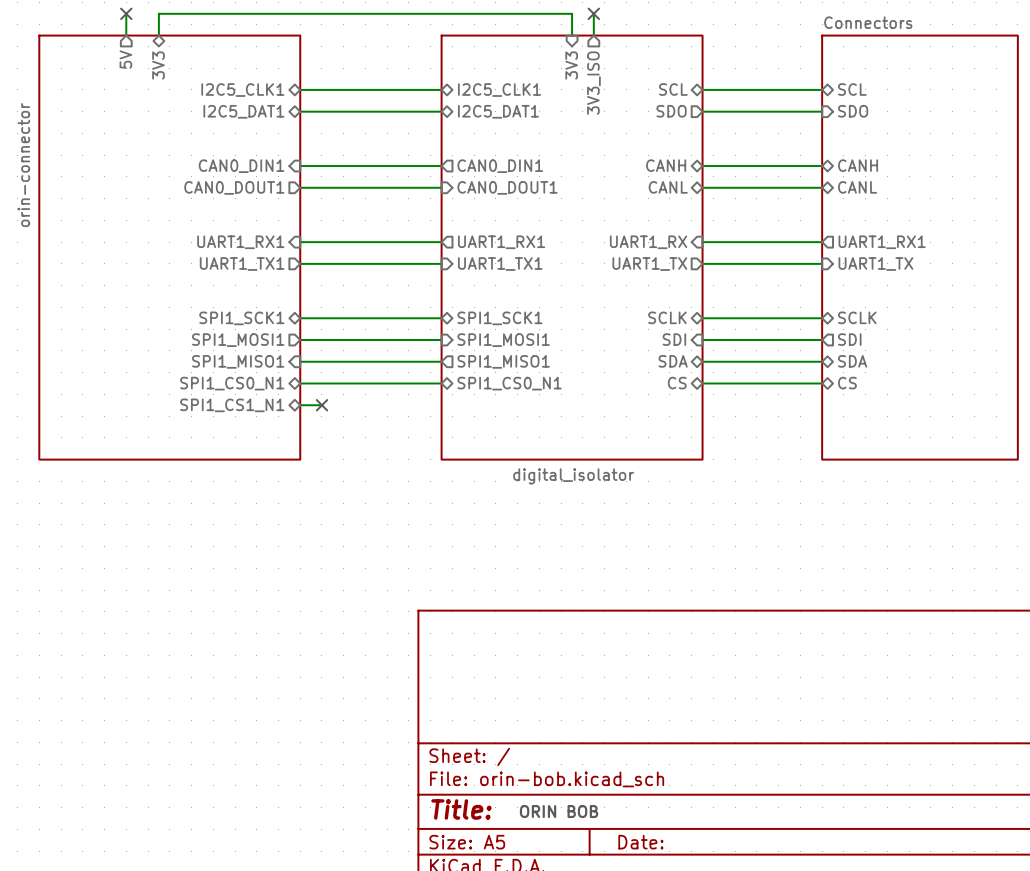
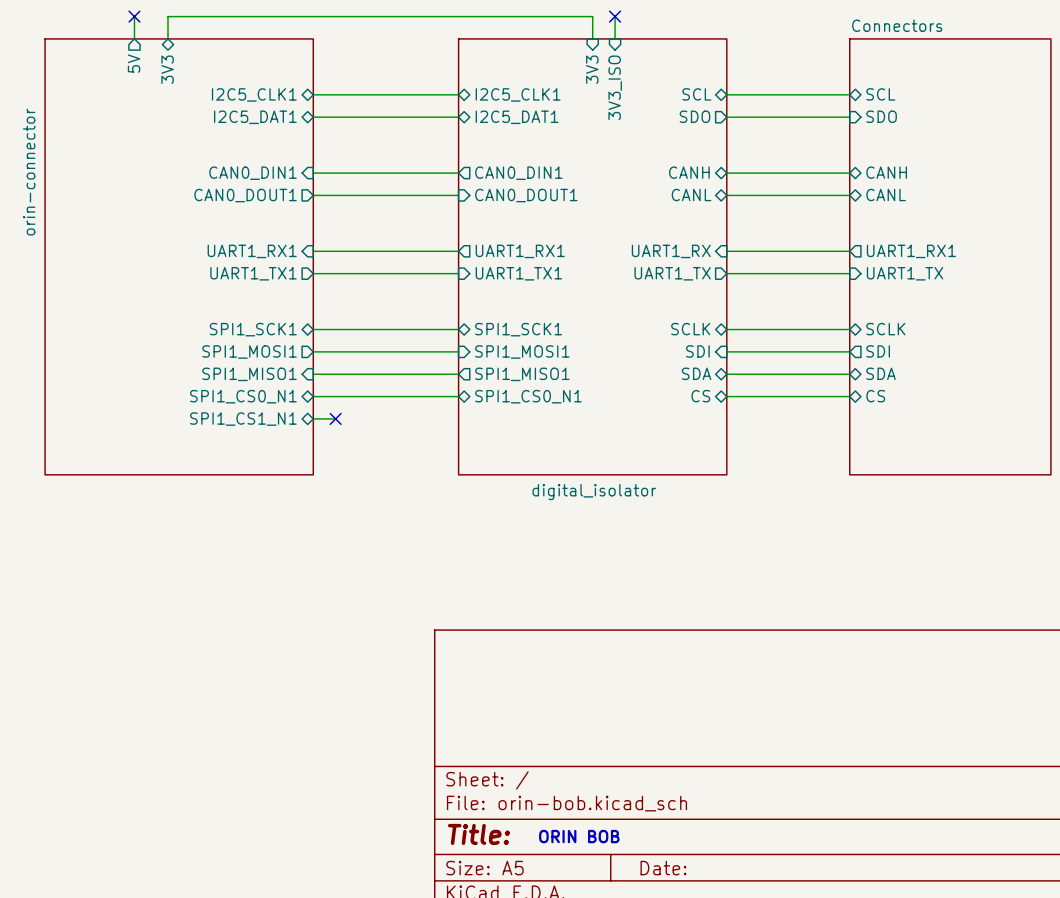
sheet pin shape: output (593, 83) -> input (615, 87)

